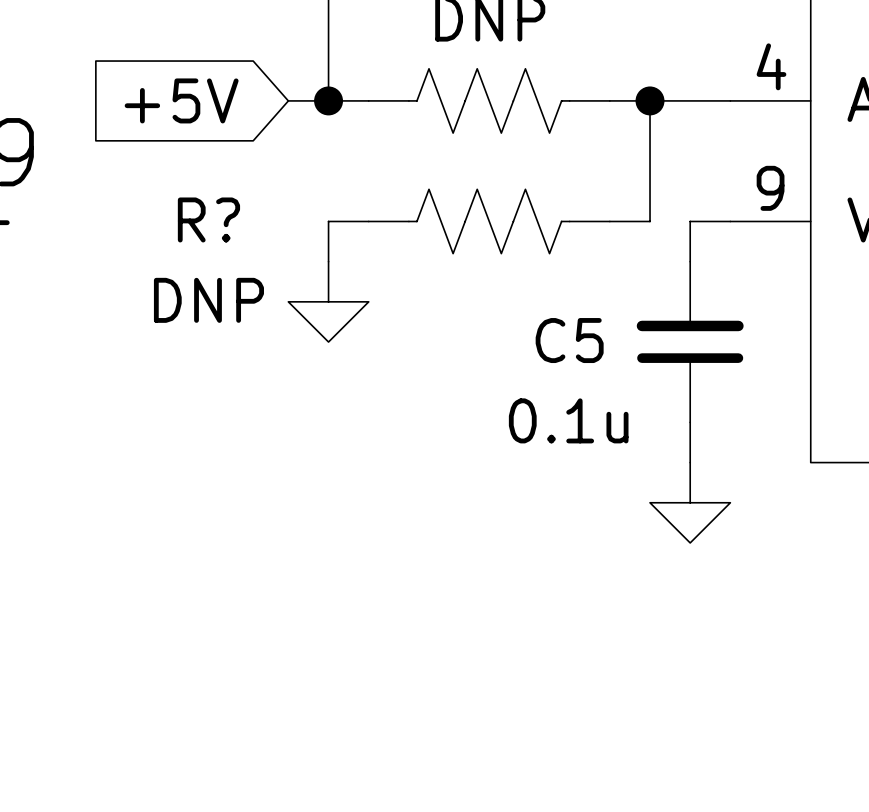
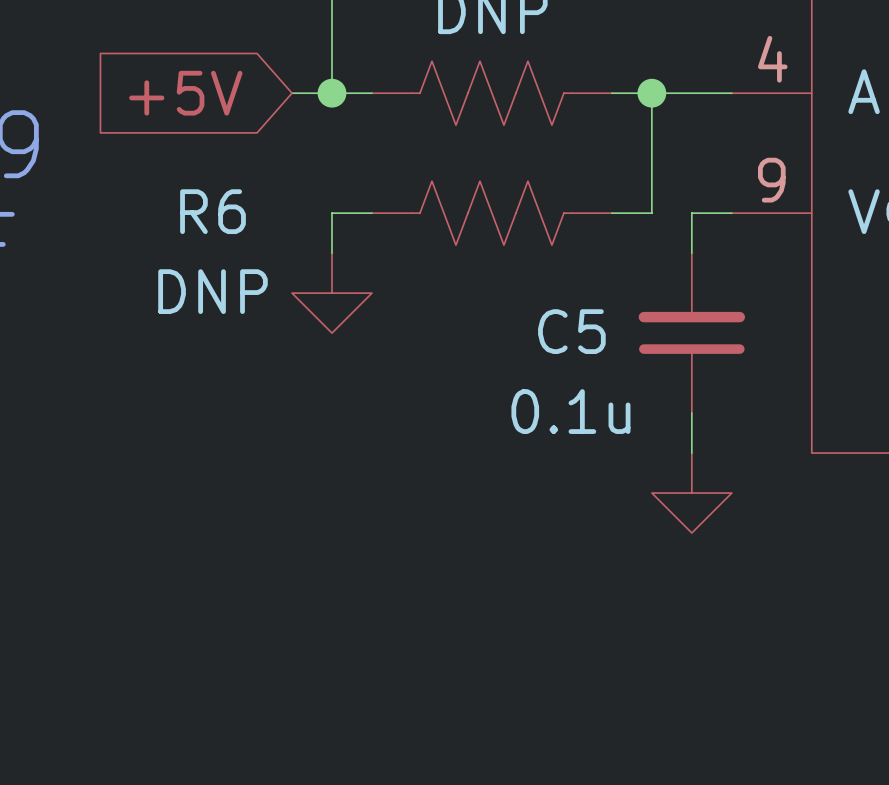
R? name: R? (208, 219) -> R6 (213, 211)

